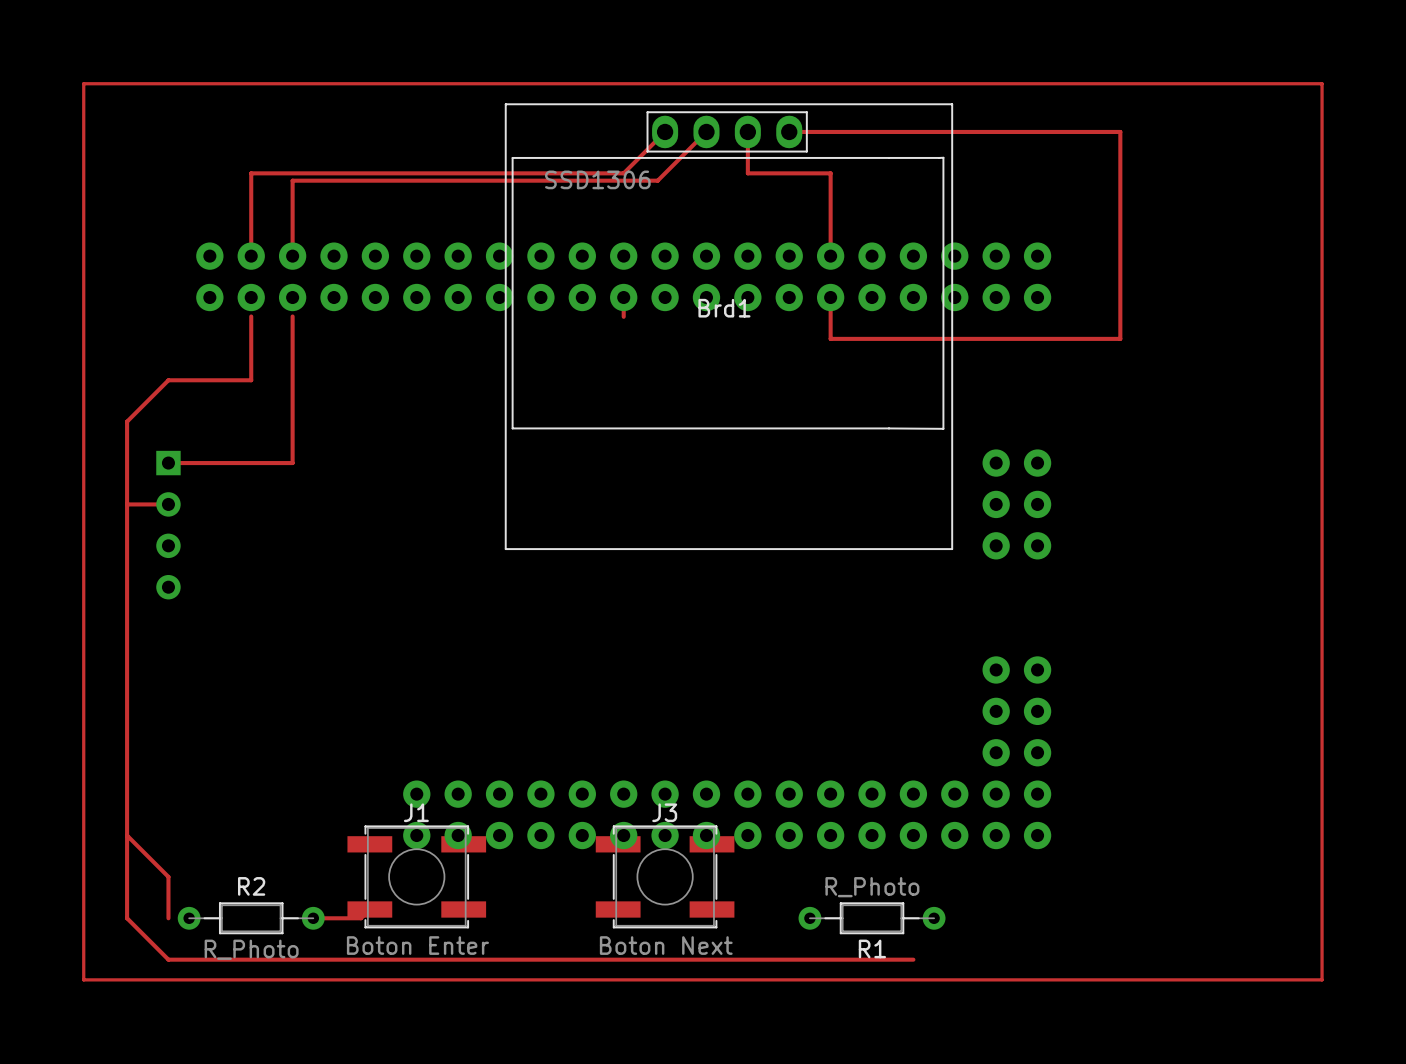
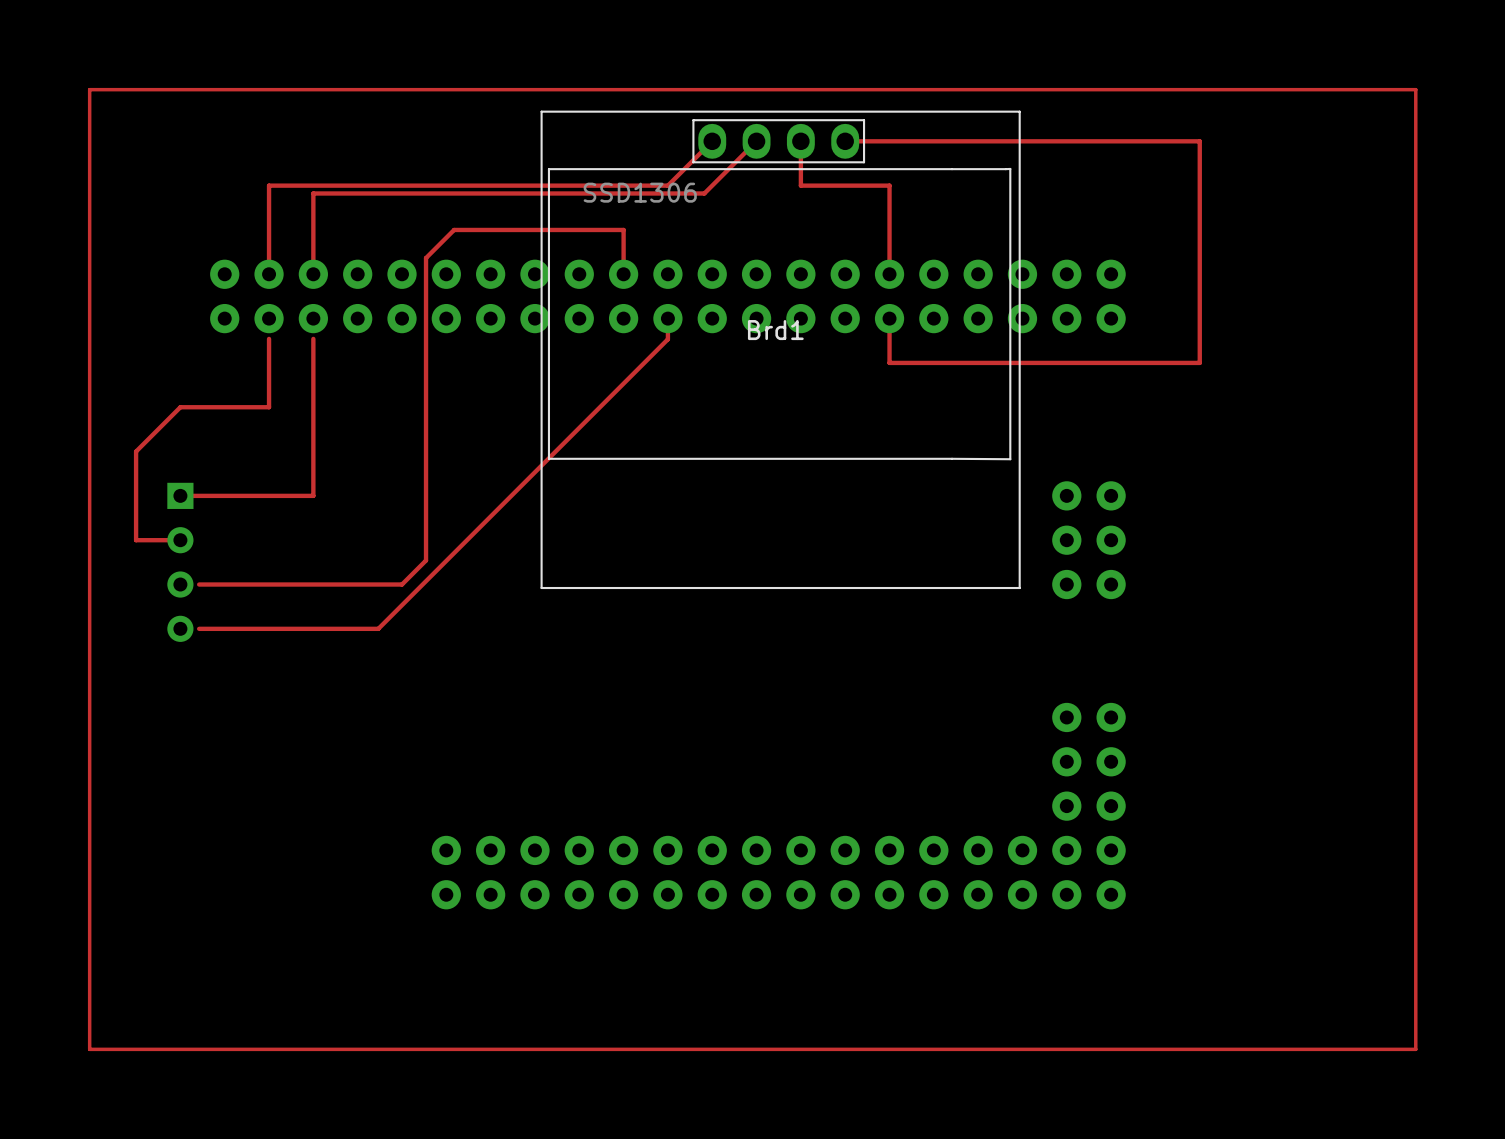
track: none -> (623, 274) (623, 229) (454, 229) (426, 258) (426, 560) (402, 584) (199, 584)
track: none -> (667, 339) (378, 628) (199, 628)
track: (127, 504) (127, 918) (168, 959) (913, 959) -> none
track: (127, 835) (168, 876) (168, 918) -> none
J1: Boton Enter (416, 876) -> none
J3: Boton Next (665, 876) -> none
track: (369, 909) (361, 918) (313, 918) -> none
R2: R_Photo (251, 918) -> none
R1: R_Photo (872, 918) -> none

